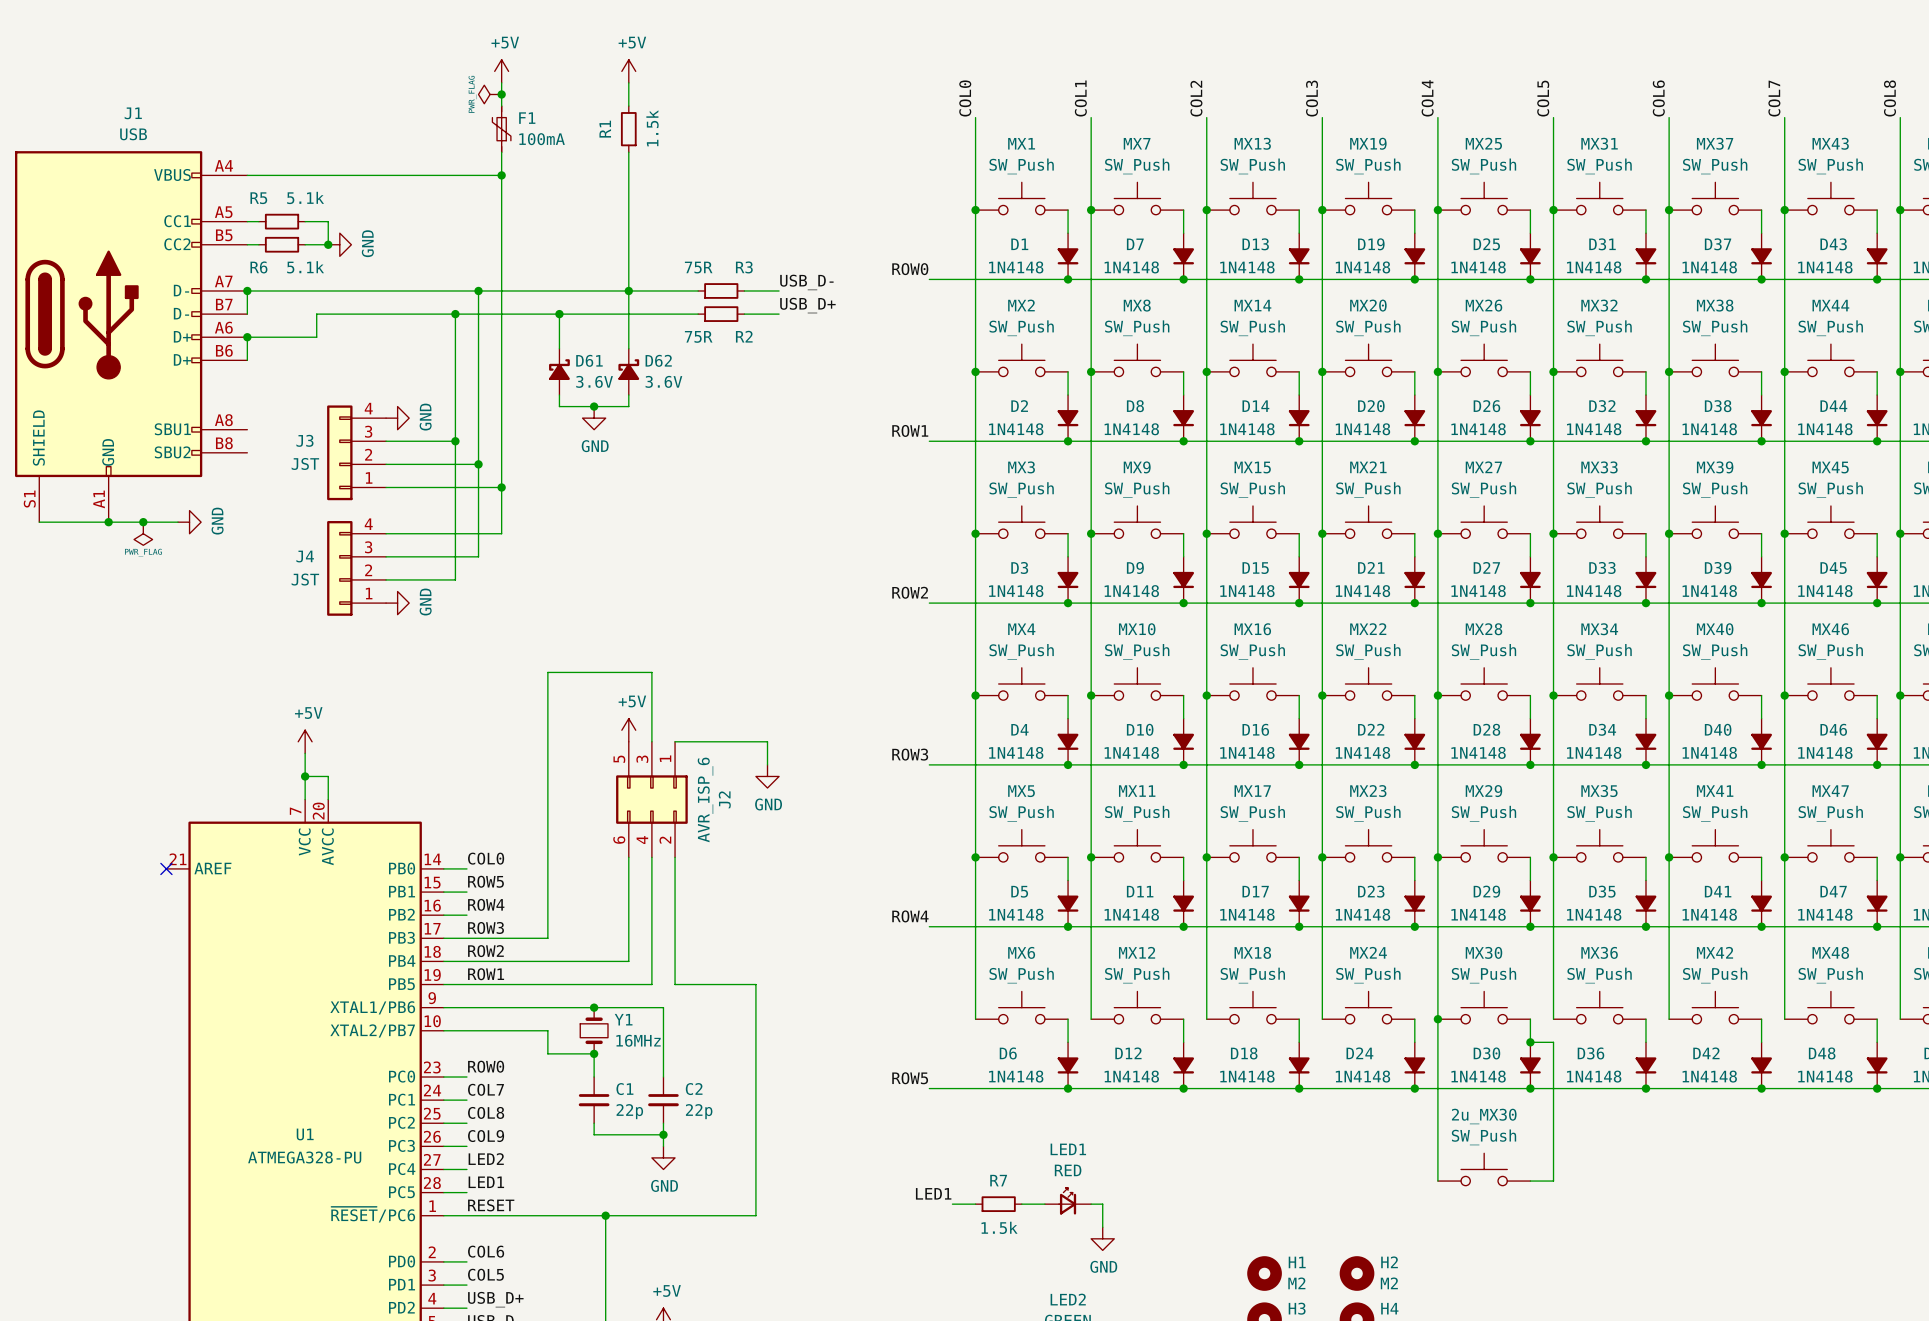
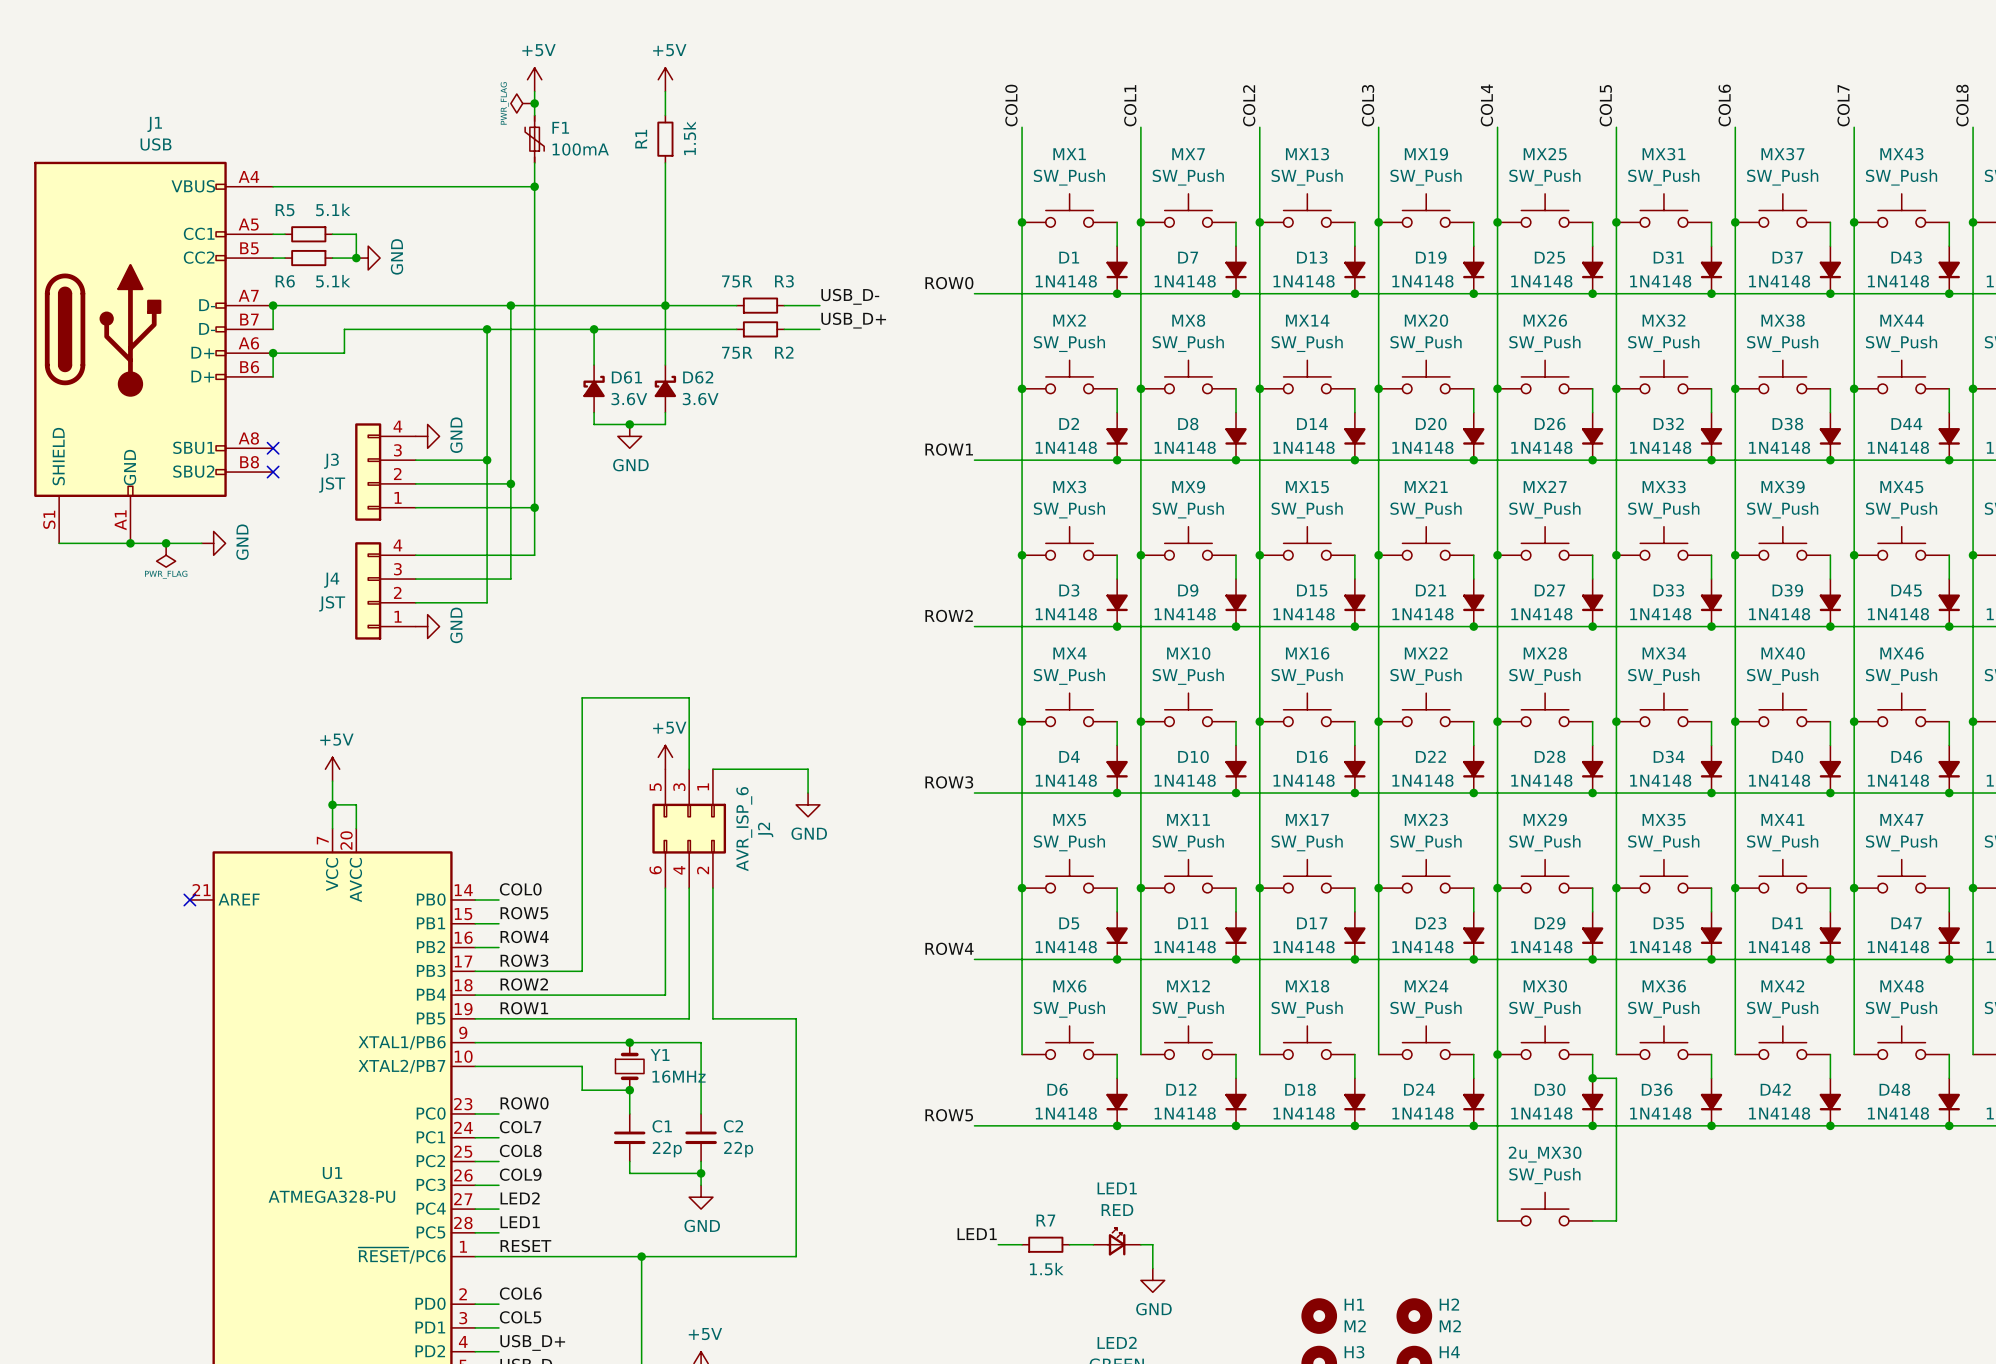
no-connect mark: none -> (273, 448)
no-connect mark: none -> (273, 472)

